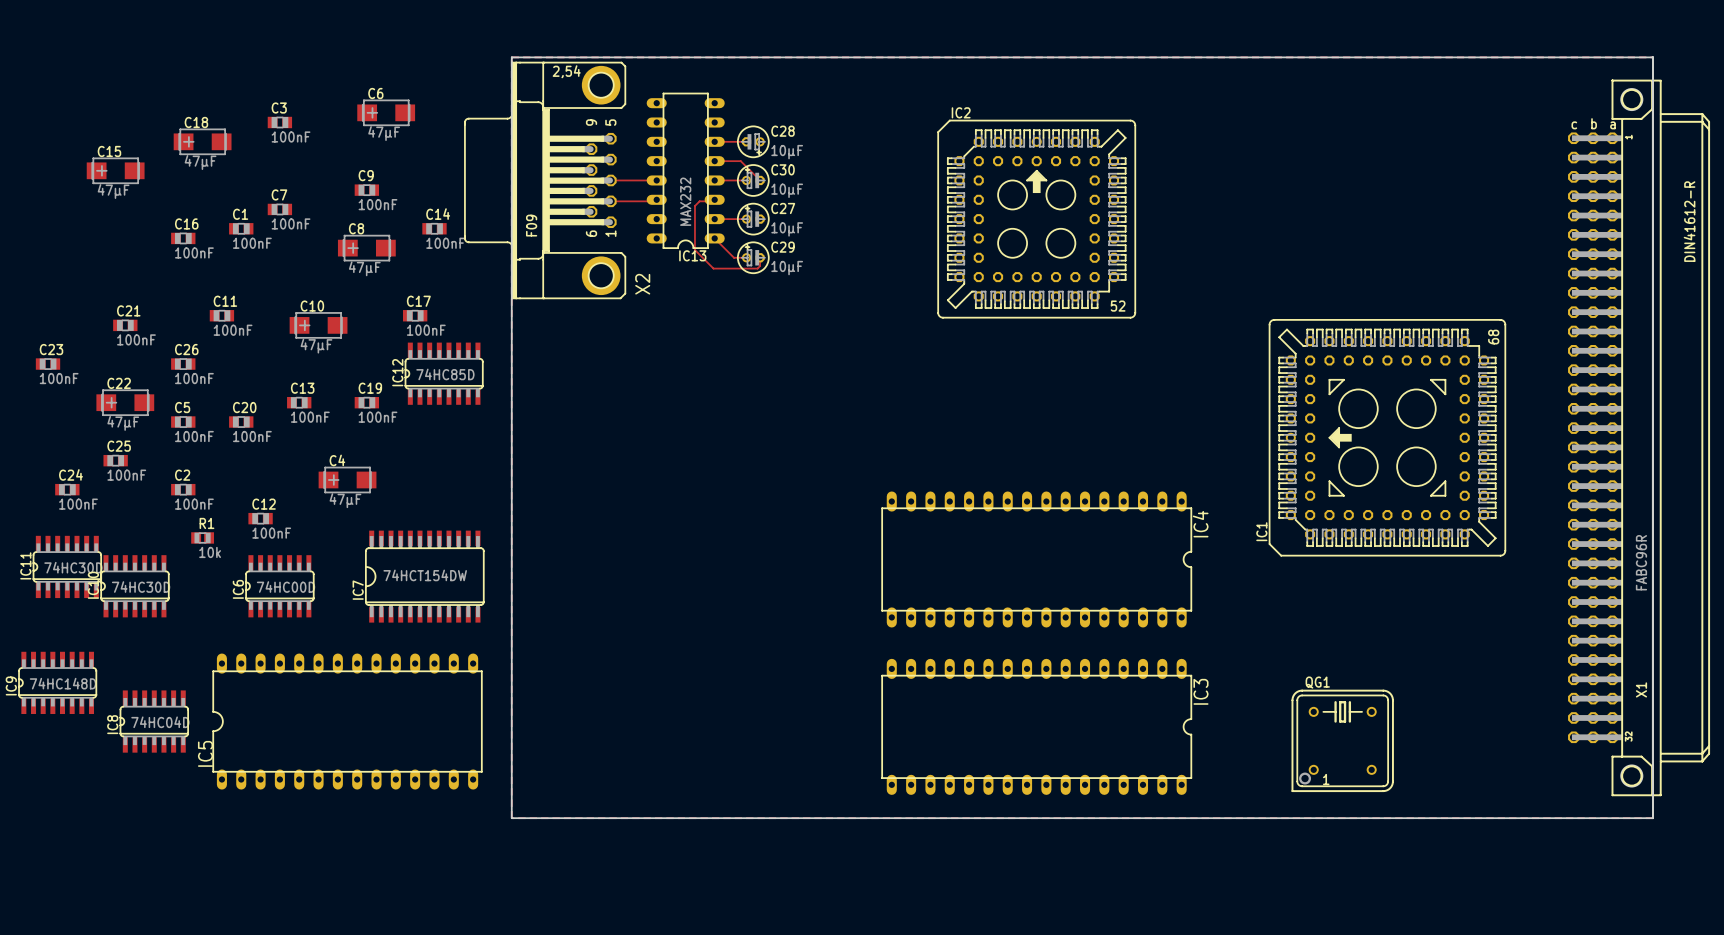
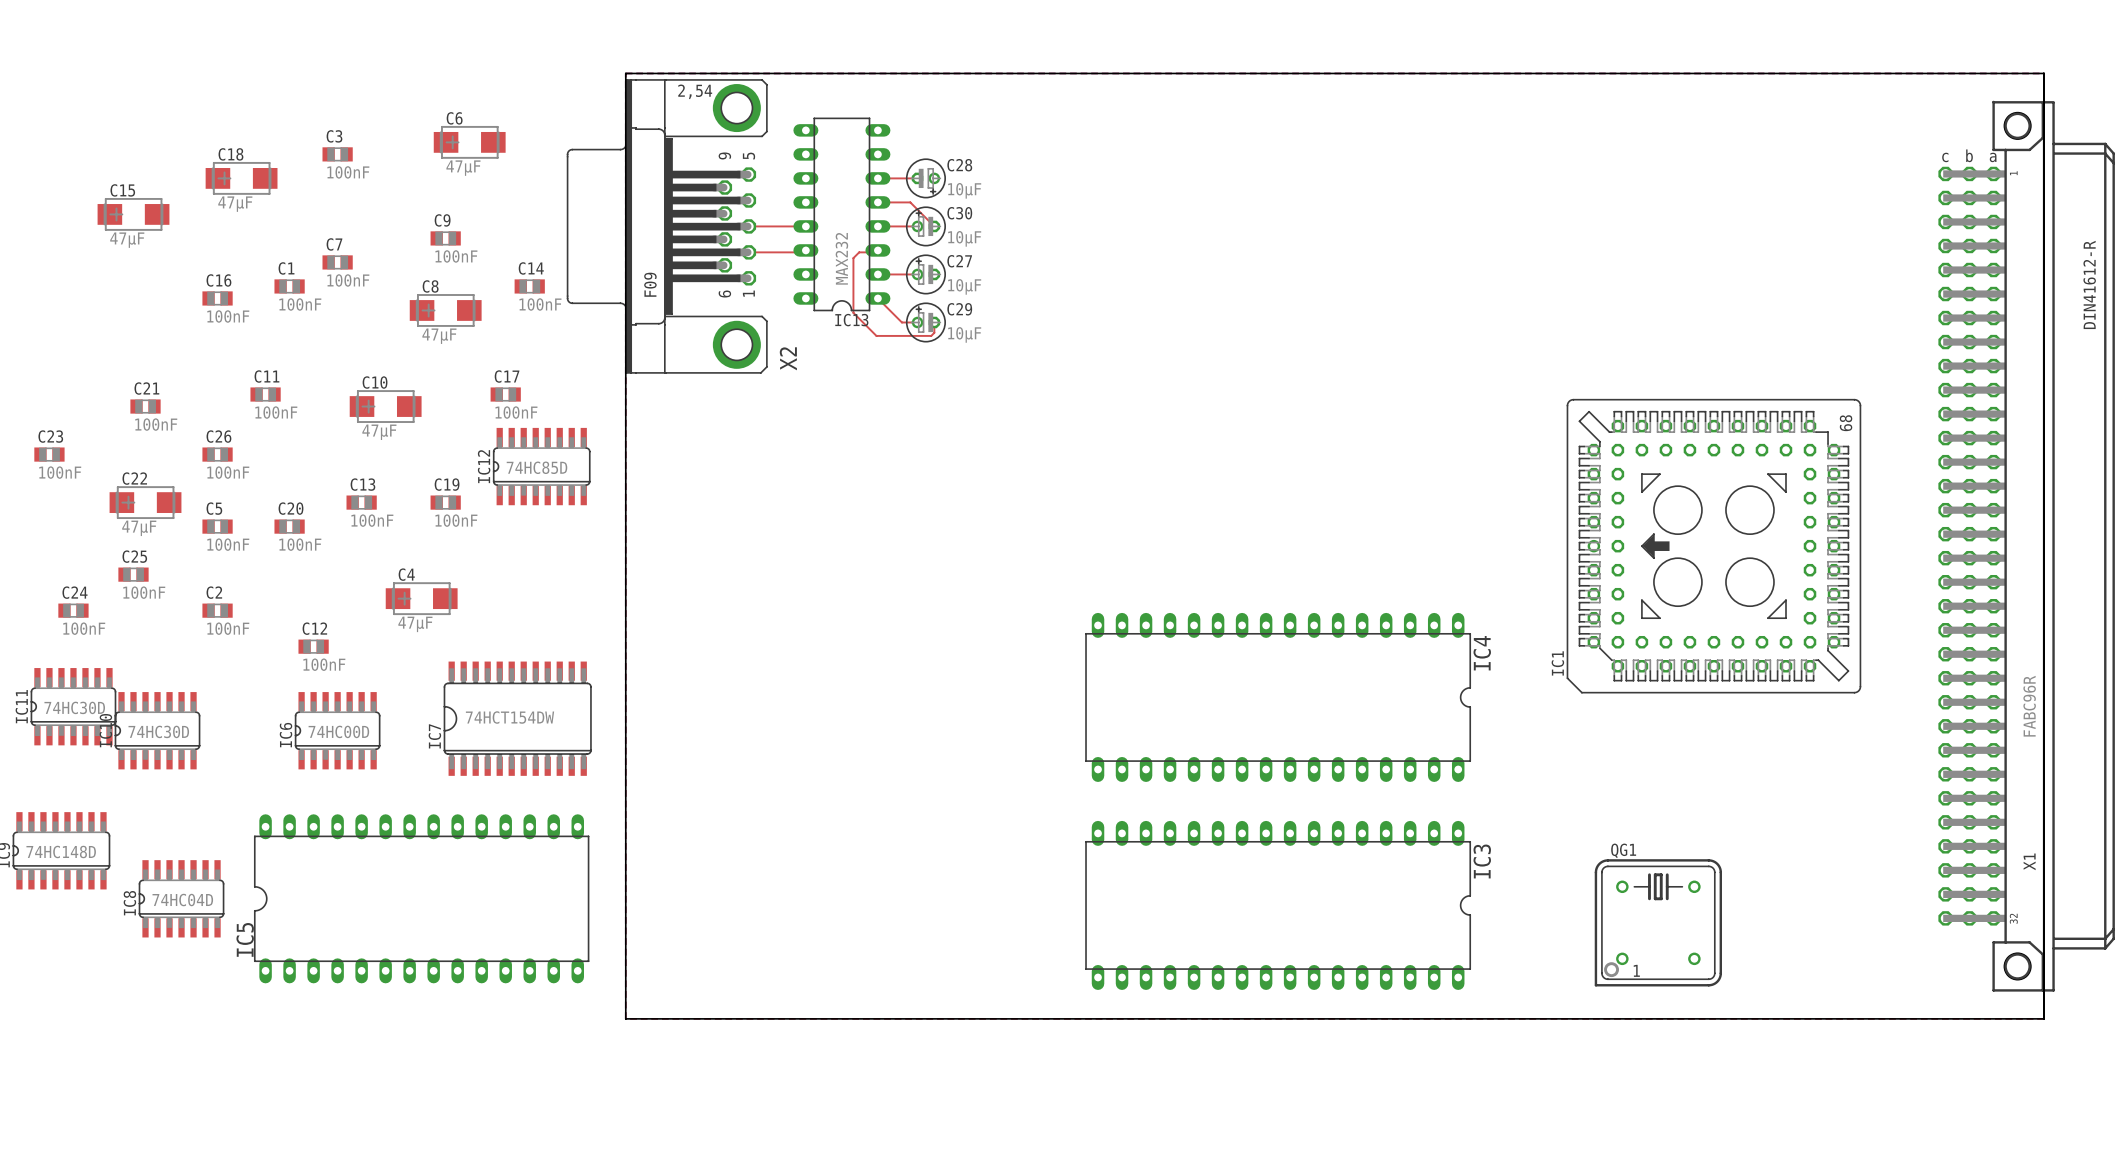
IC2: (1036, 219) -> none
R1: 10k (202, 537) -> none

